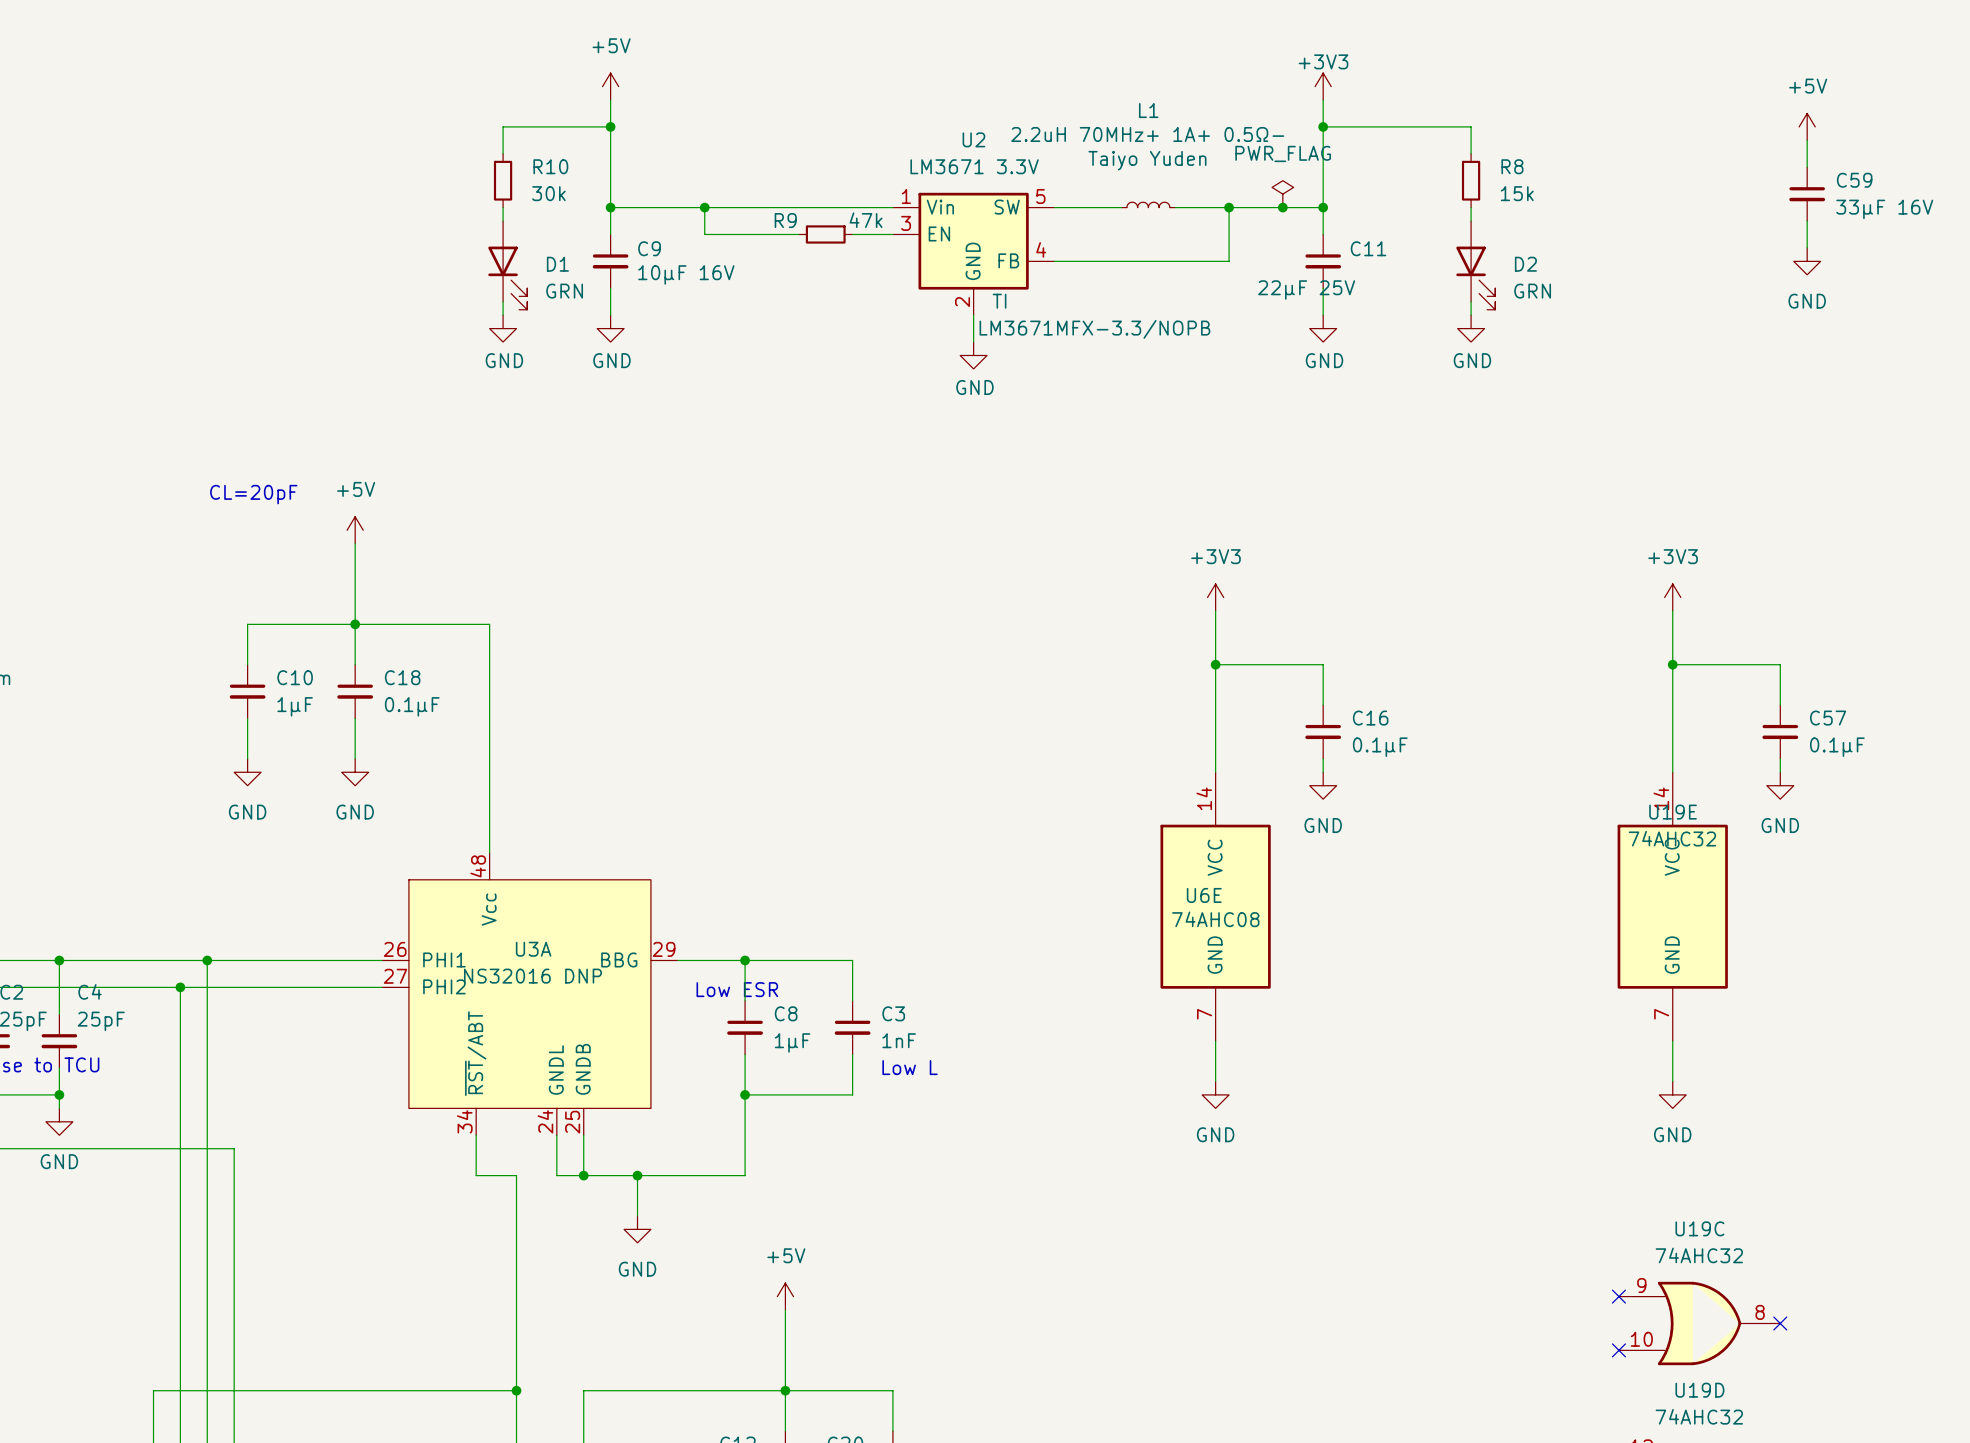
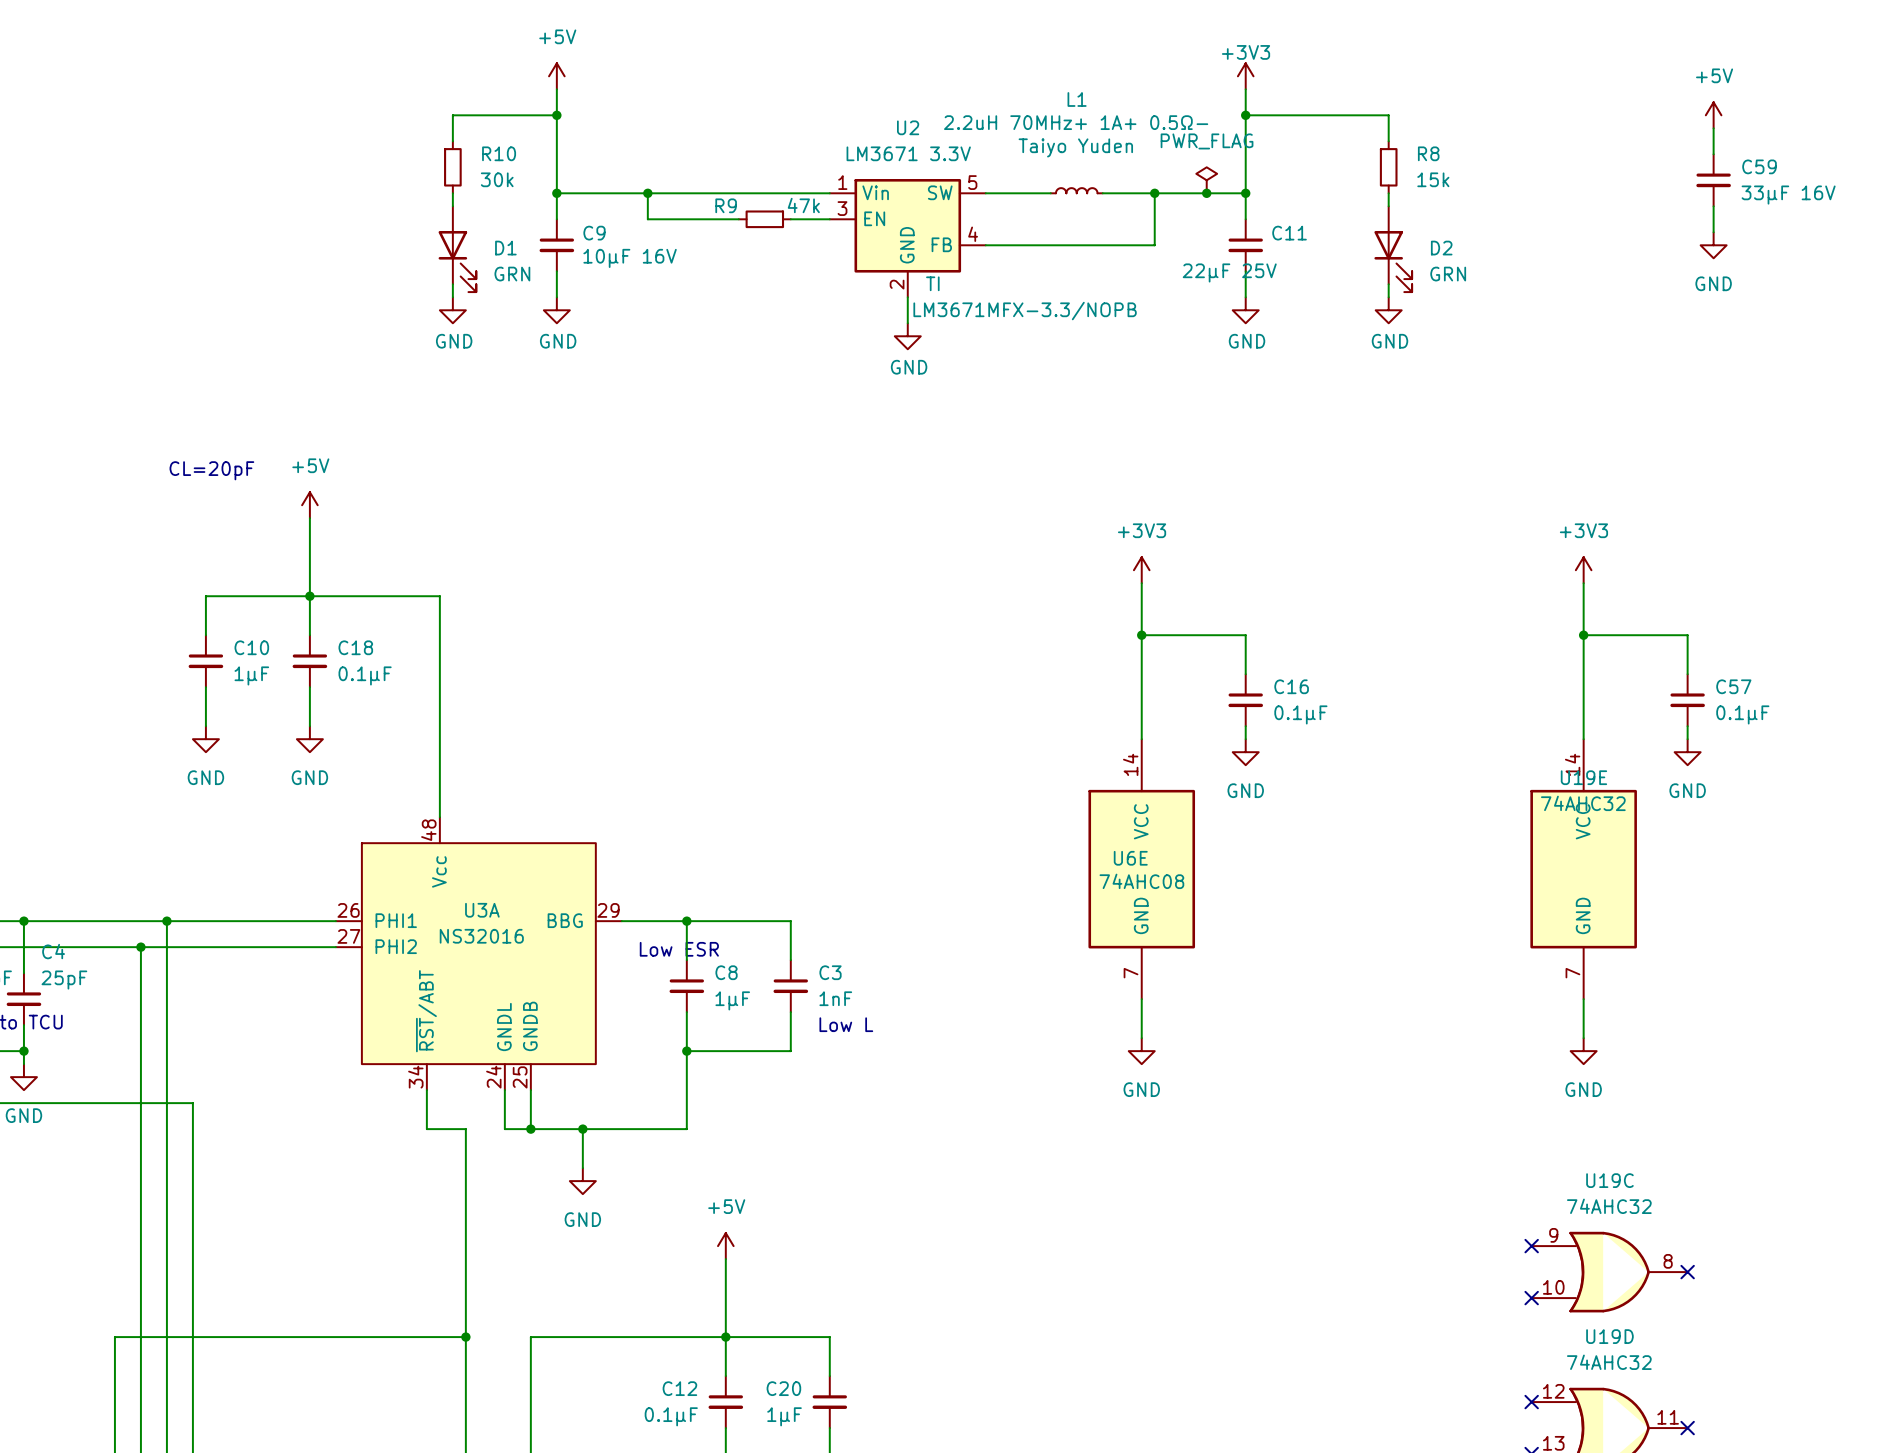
U3A value: NS32016 DNP (532, 976) -> NS32016 (481, 936)

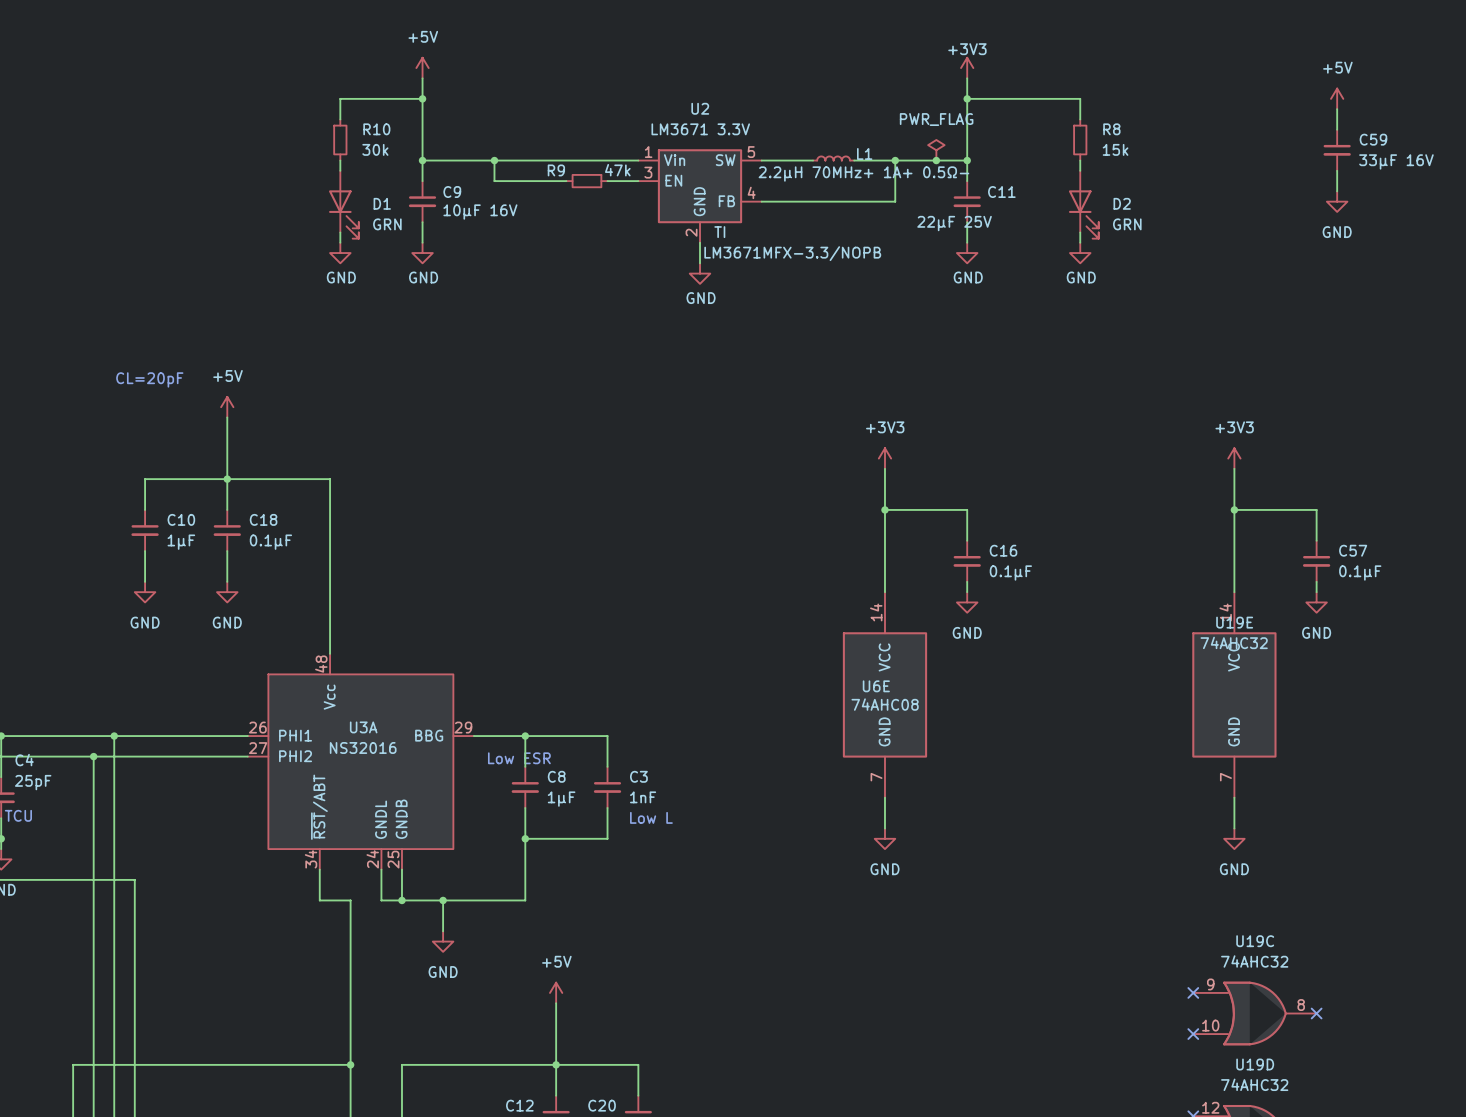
L1 name position: L1 (1077, 99) -> L1 (864, 153)
L1 value: 2.2uH 70MHz+ 1A+ 0.5Ω- (1076, 122) -> 2.2µH 70MHz+ 1A+ 0.5Ω- (863, 174)
L1 text: Taiyo Yuden (1075, 147) -> none

